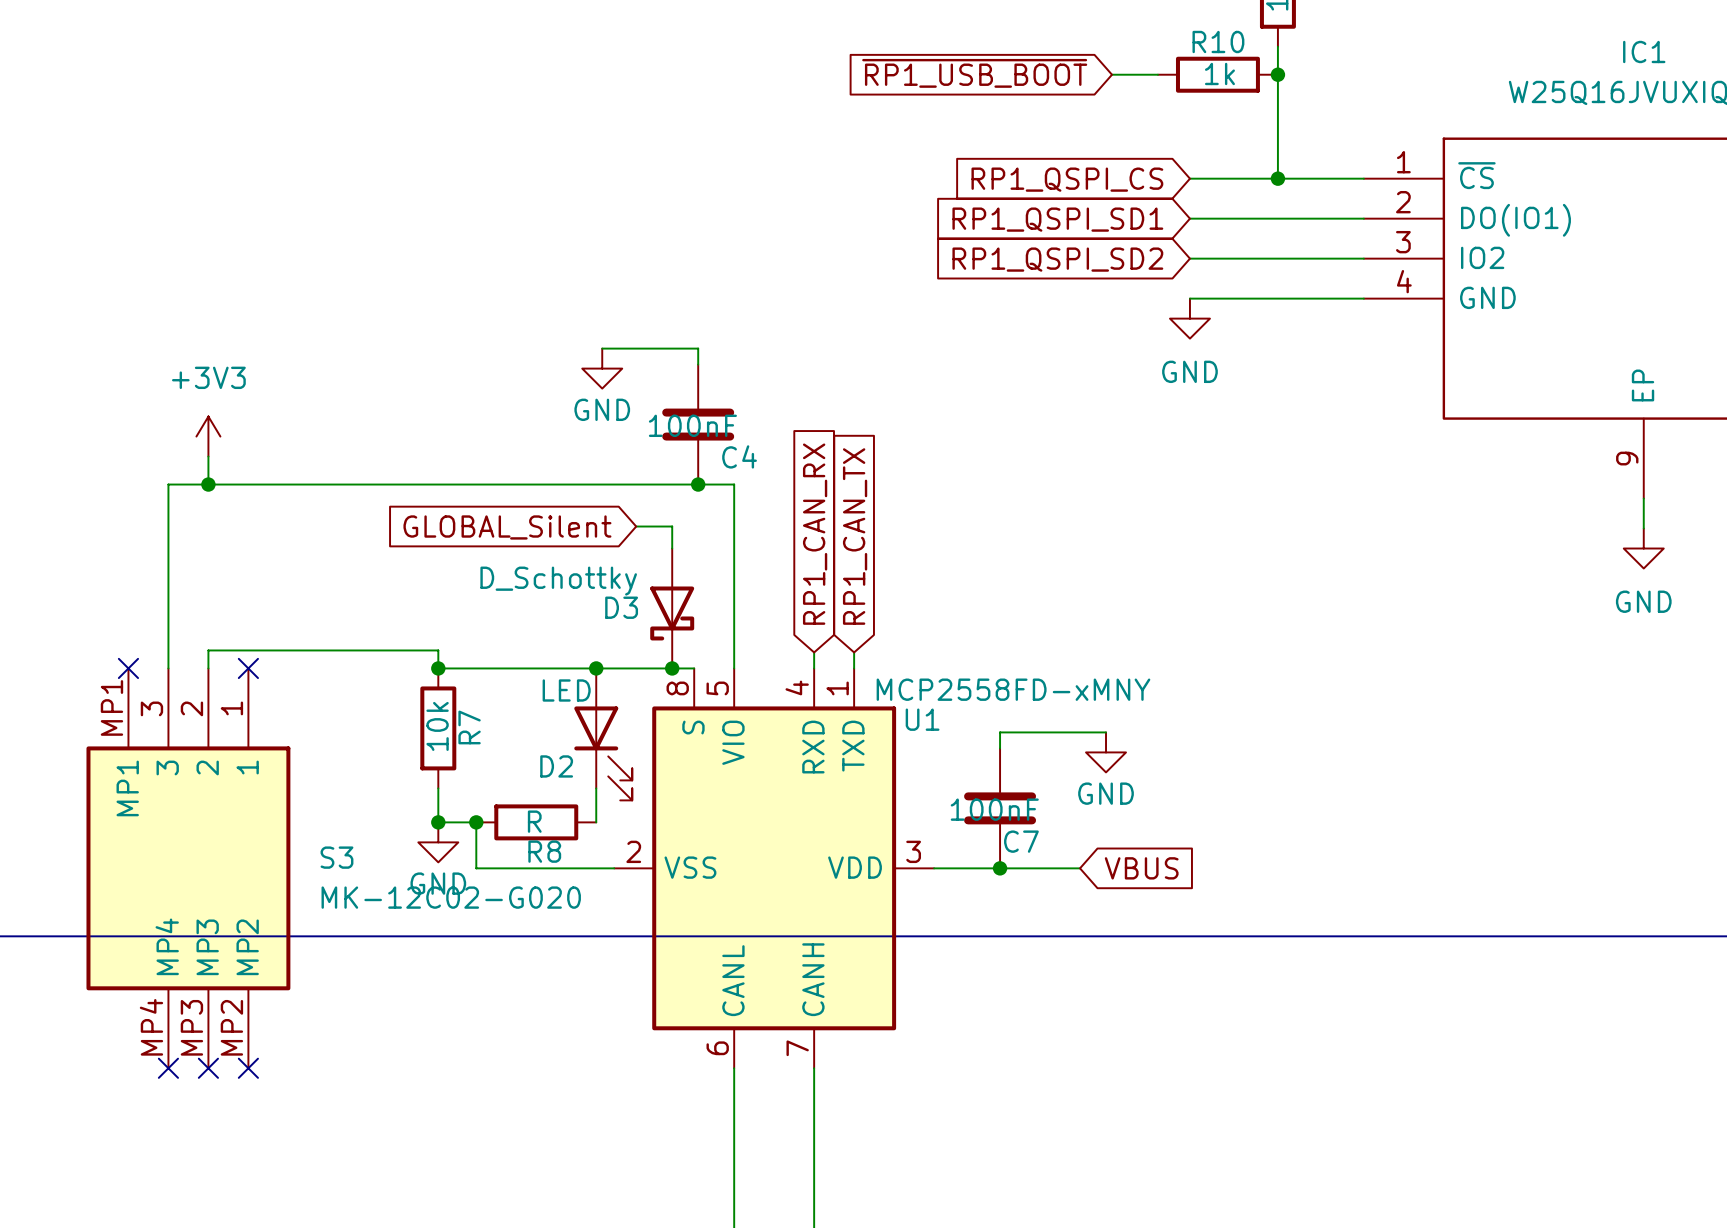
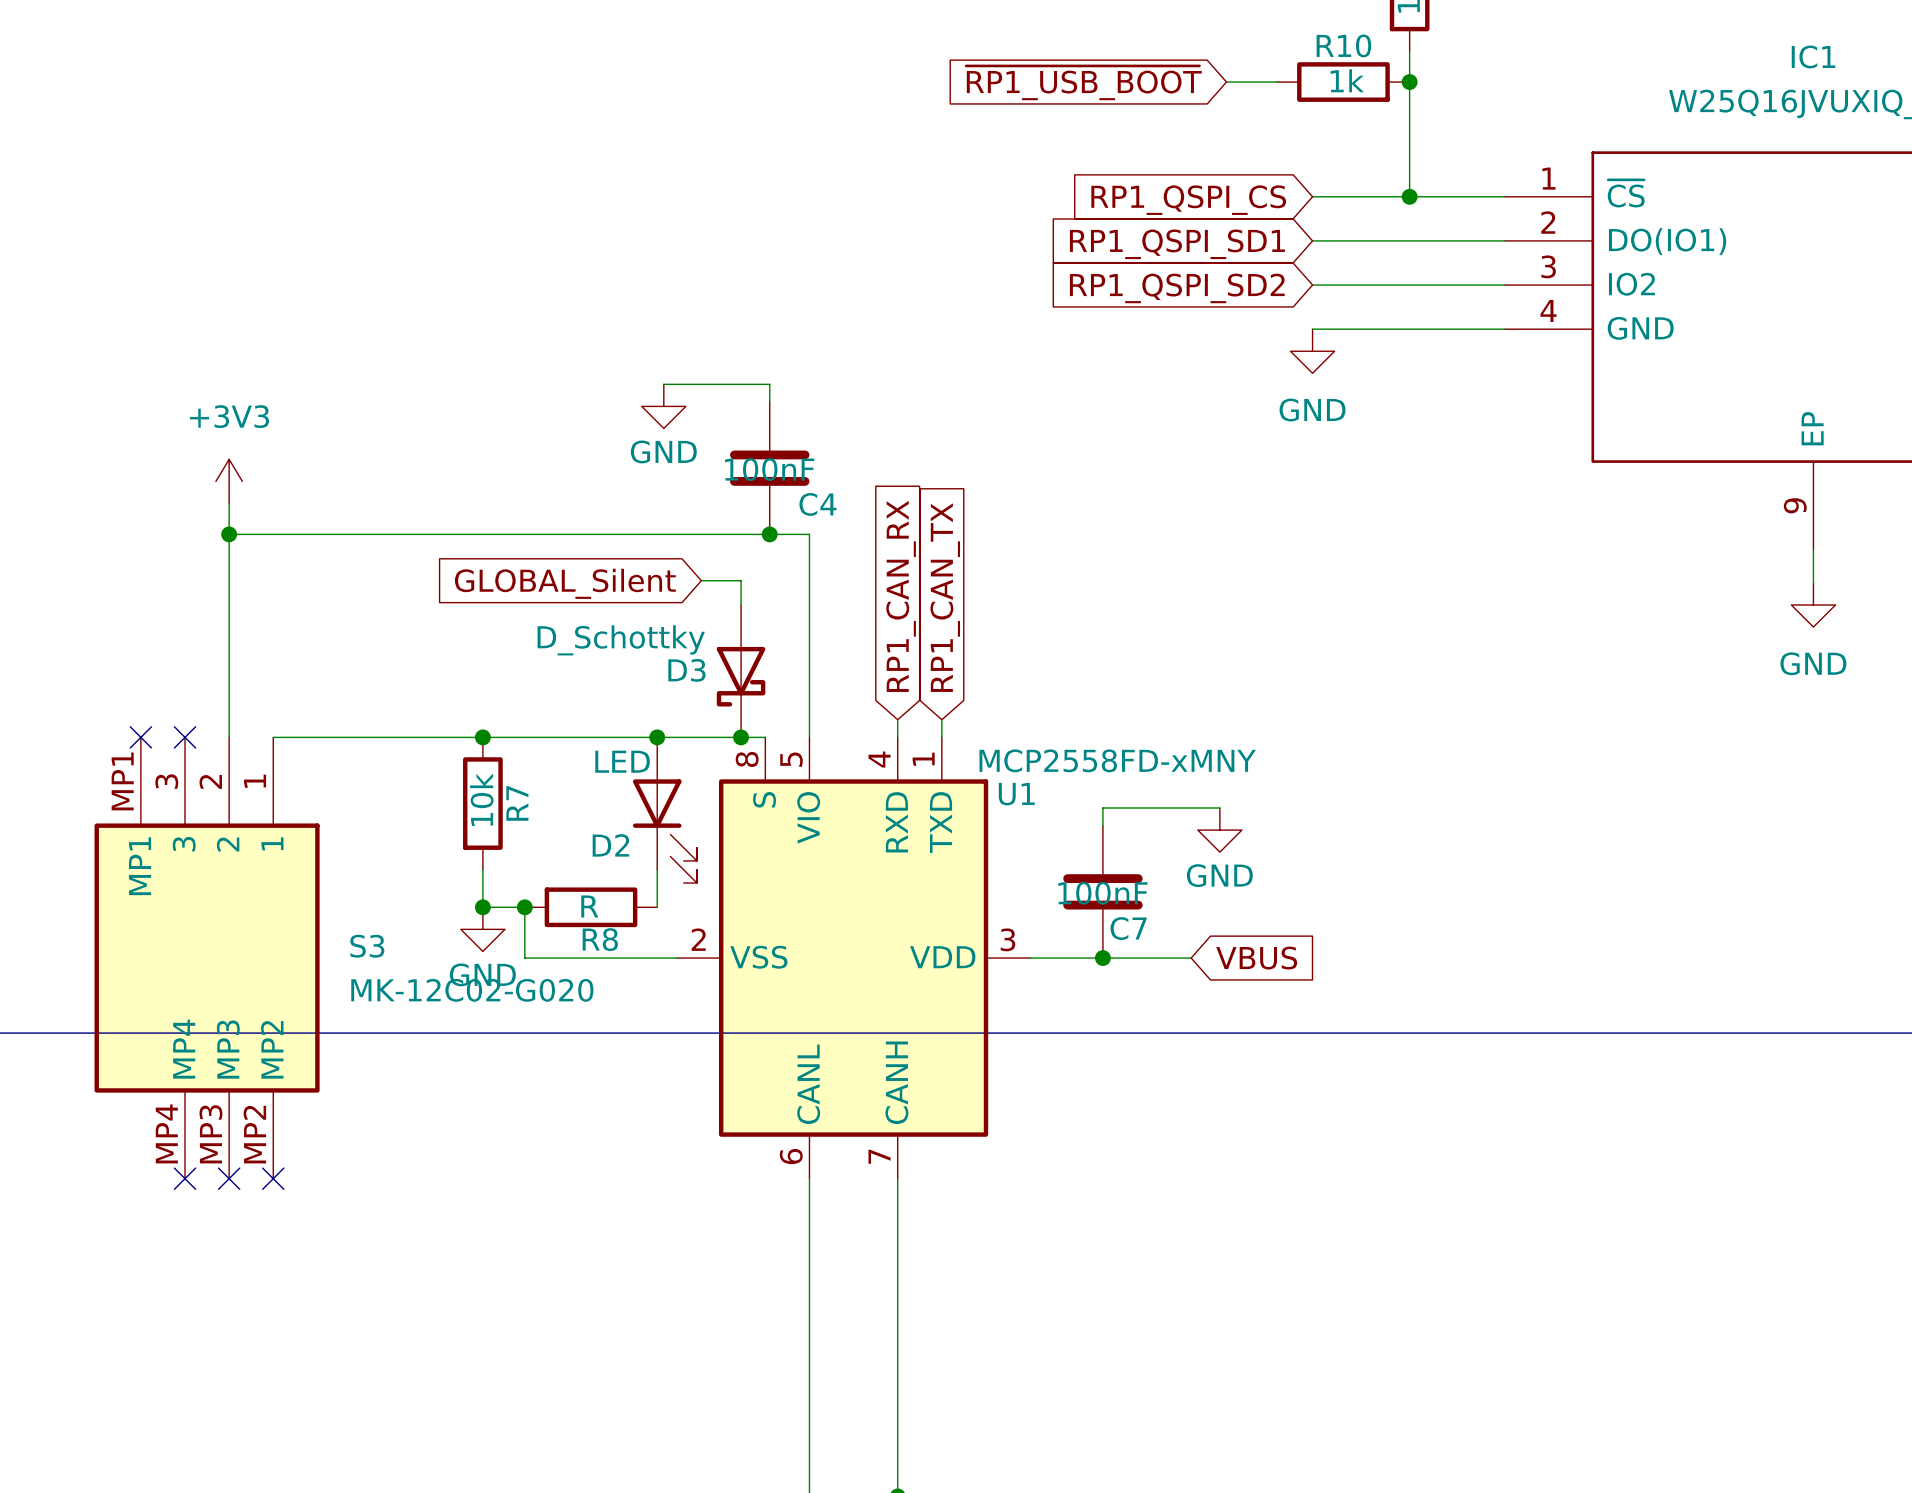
wire: (208, 484) (168, 484) (168, 668) -> (229, 534) (229, 717)
wire: (208, 650) (438, 650) (438, 668) -> (273, 737) (482, 737)
no-connect mark position: (248, 668) -> (185, 737)

